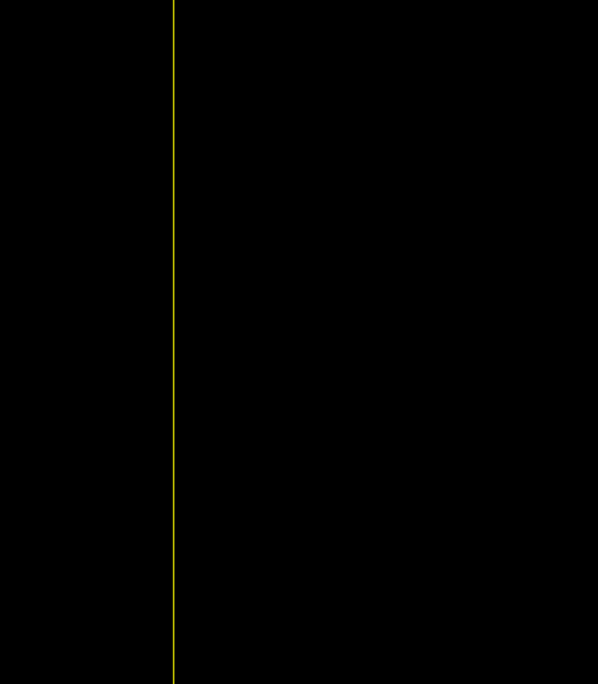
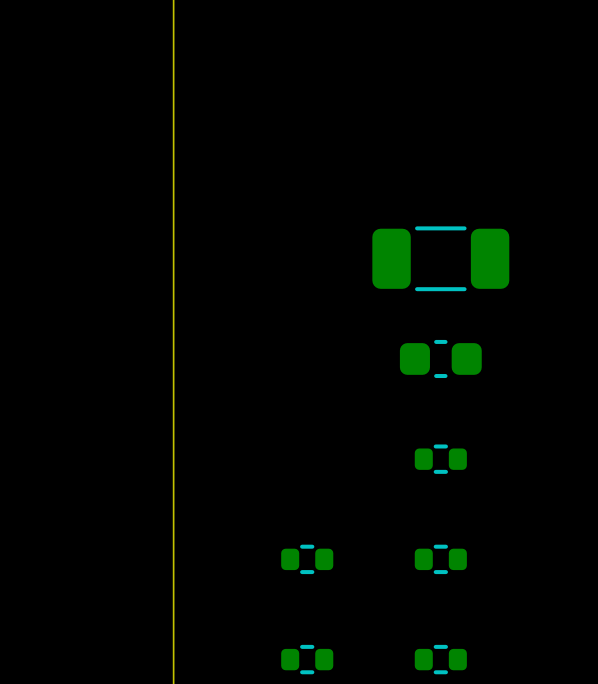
part: none -> (440, 258)
part: none -> (440, 358)
part: none -> (440, 459)
part: none -> (307, 559)
part: none -> (440, 559)
part: none -> (307, 659)
part: none -> (440, 659)

